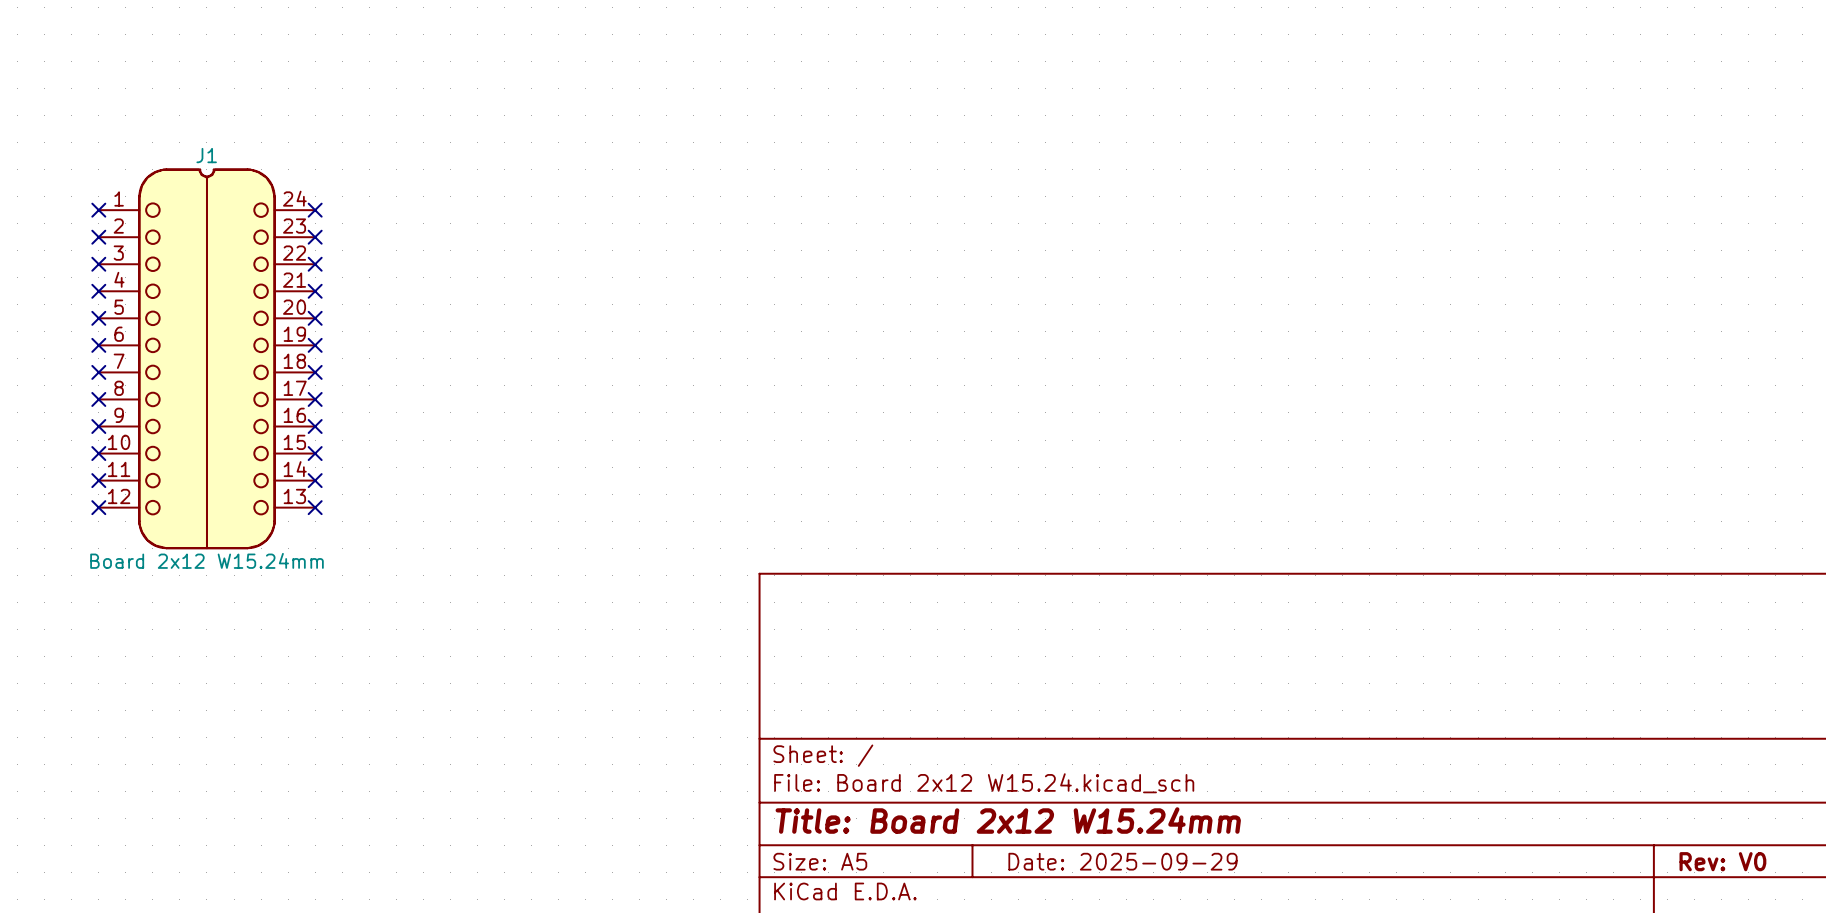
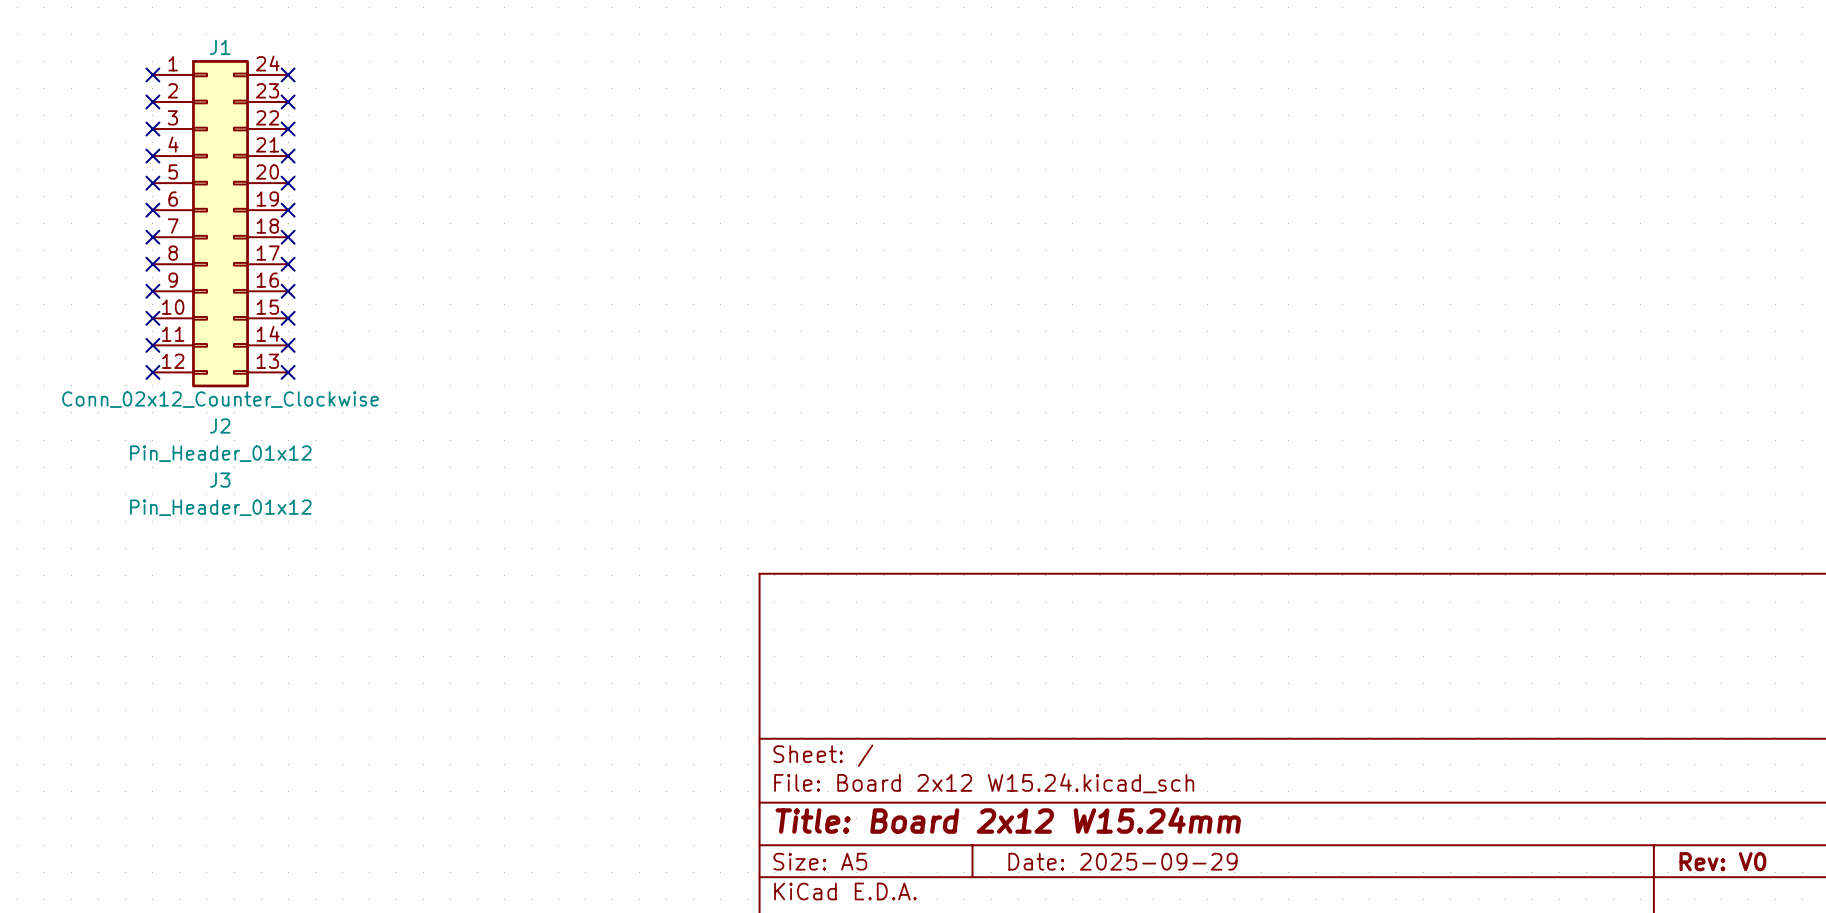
no-connect mark: none -> (152, 74)
no-connect mark: none -> (288, 74)
no-connect mark: none -> (152, 101)
no-connect mark: none -> (288, 101)
no-connect mark: none -> (152, 129)
no-connect mark: none -> (288, 129)
J1 name position: J1 (206, 155) -> J1 (220, 47)
no-connect mark: none -> (152, 156)
no-connect mark: none -> (288, 156)
J1 symbol: [98, 169, 316, 549] -> [152, 60, 289, 388]
no-connect mark: none -> (152, 183)
no-connect mark: none -> (288, 183)
no-connect mark: (98, 210) -> none
no-connect mark: none -> (152, 210)
no-connect mark: none -> (288, 210)
no-connect mark: (315, 210) -> none
no-connect mark: (98, 237) -> none
no-connect mark: none -> (152, 237)
no-connect mark: none -> (288, 237)
no-connect mark: (315, 237) -> none
no-connect mark: (98, 264) -> none
no-connect mark: none -> (152, 264)
no-connect mark: none -> (288, 264)
no-connect mark: (315, 264) -> none
no-connect mark: (98, 291) -> none
no-connect mark: none -> (152, 291)
no-connect mark: none -> (288, 291)
no-connect mark: (315, 291) -> none
no-connect mark: (98, 318) -> none
no-connect mark: none -> (152, 318)
no-connect mark: none -> (288, 318)
no-connect mark: (315, 318) -> none
no-connect mark: (98, 345) -> none
no-connect mark: none -> (152, 345)
no-connect mark: none -> (288, 345)
no-connect mark: (315, 345) -> none
no-connect mark: (98, 372) -> none
no-connect mark: none -> (152, 372)
no-connect mark: none -> (288, 372)
no-connect mark: (315, 372) -> none
no-connect mark: (98, 399) -> none
no-connect mark: (315, 399) -> none
no-connect mark: (98, 426) -> none
no-connect mark: (315, 426) -> none
J2: none -> Pin_Header_01x12 (220, 440)
no-connect mark: (98, 453) -> none
no-connect mark: (315, 453) -> none
no-connect mark: (98, 480) -> none
no-connect mark: (315, 480) -> none
J3: none -> Pin_Header_01x12 (220, 494)
no-connect mark: (98, 507) -> none
no-connect mark: (315, 507) -> none
J1 value: Board 2x12 W15.24mm (206, 560) -> Conn_02x12_Counter_Clockwise (220, 399)

